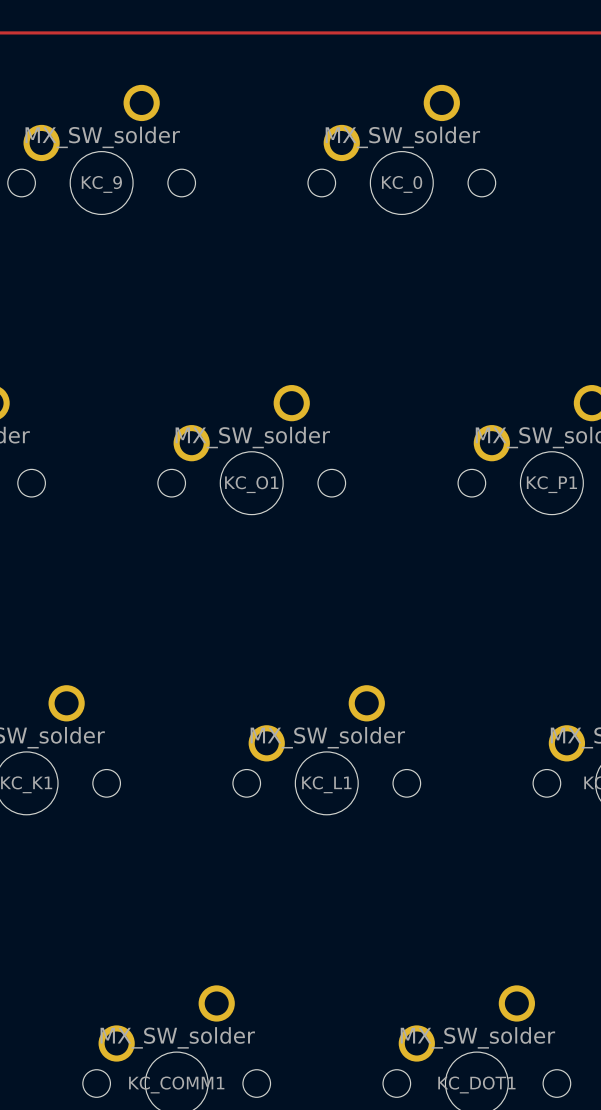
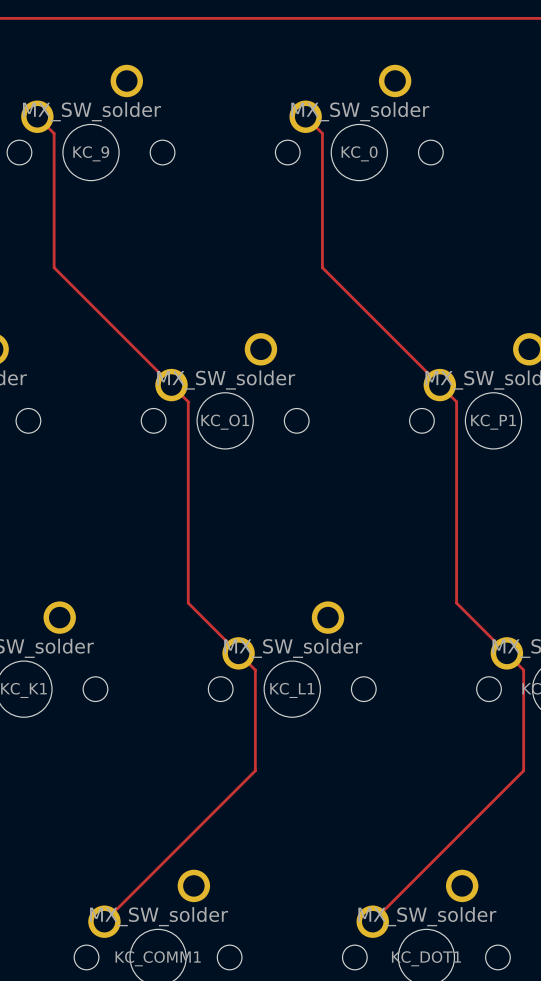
track: none -> (37, 116) (54, 133) (54, 267) (188, 401) (188, 603) (255, 670) (255, 770) (104, 921)
track: none -> (305, 116) (322, 133) (322, 267) (456, 401) (456, 603) (523, 670) (523, 770) (372, 921)

